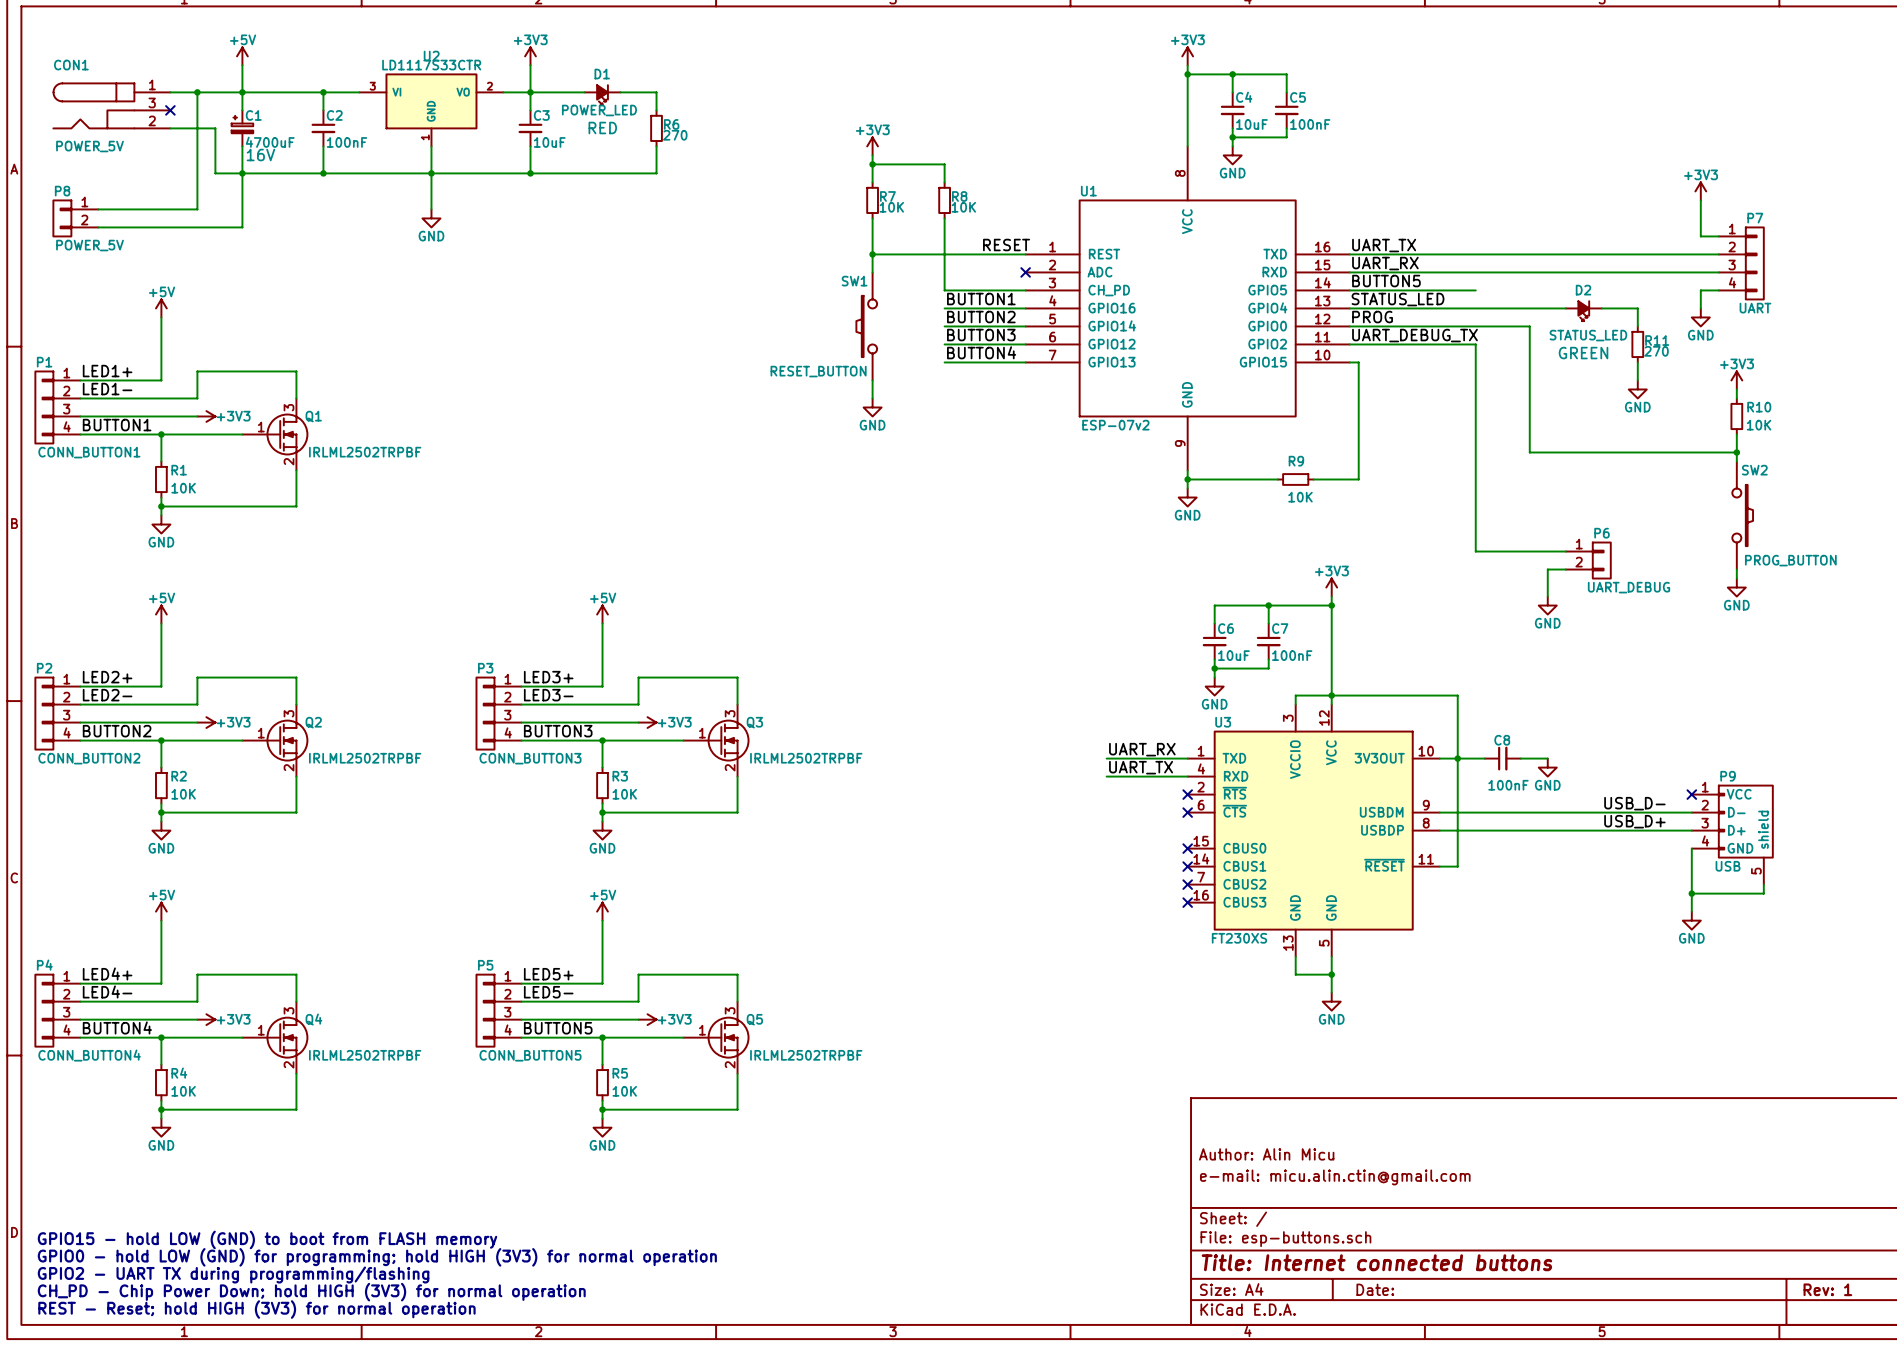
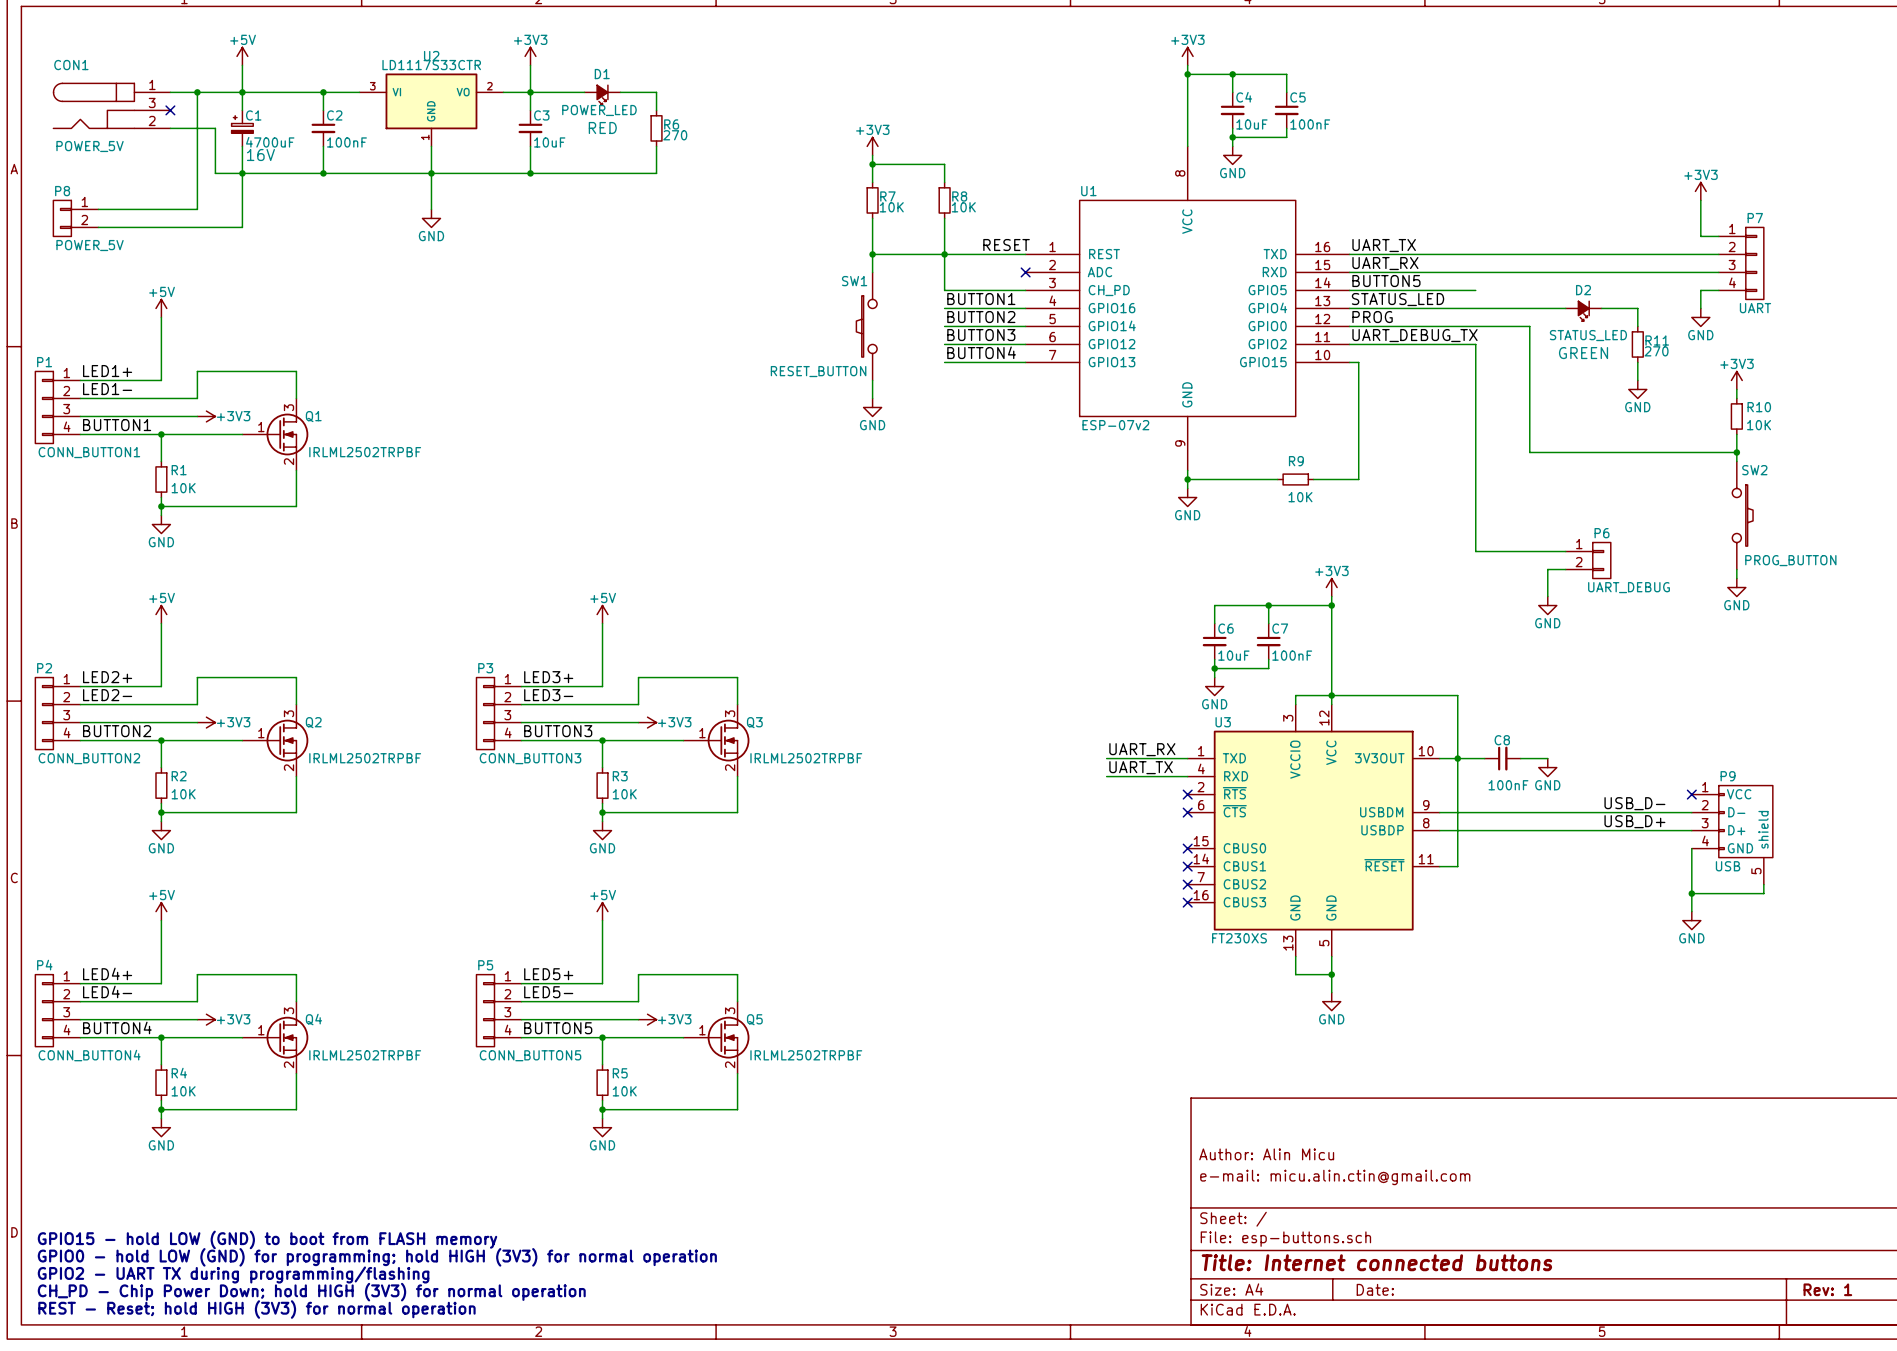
junction: none -> (944, 254)

